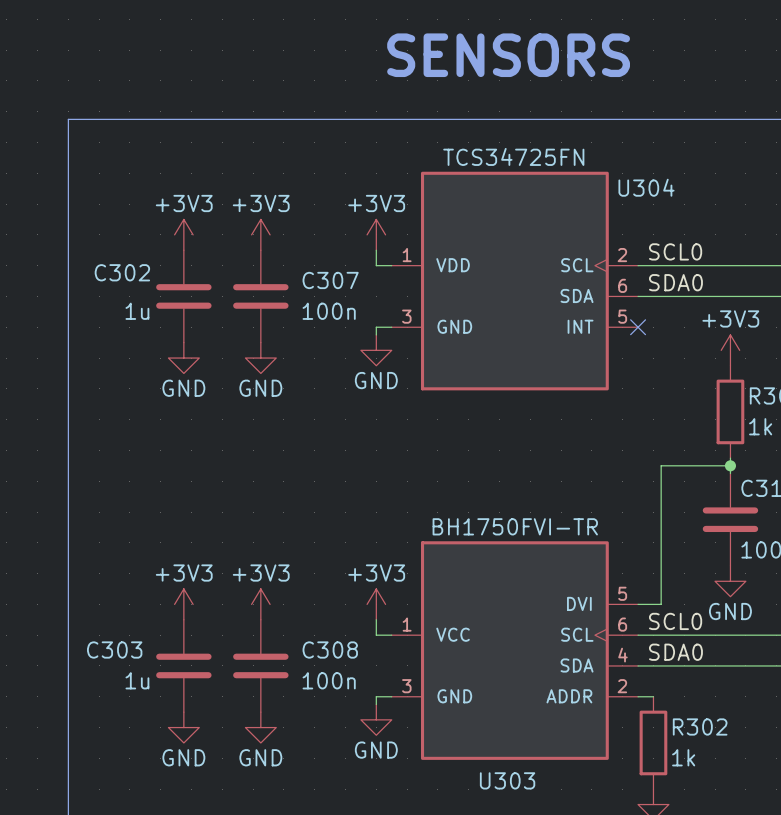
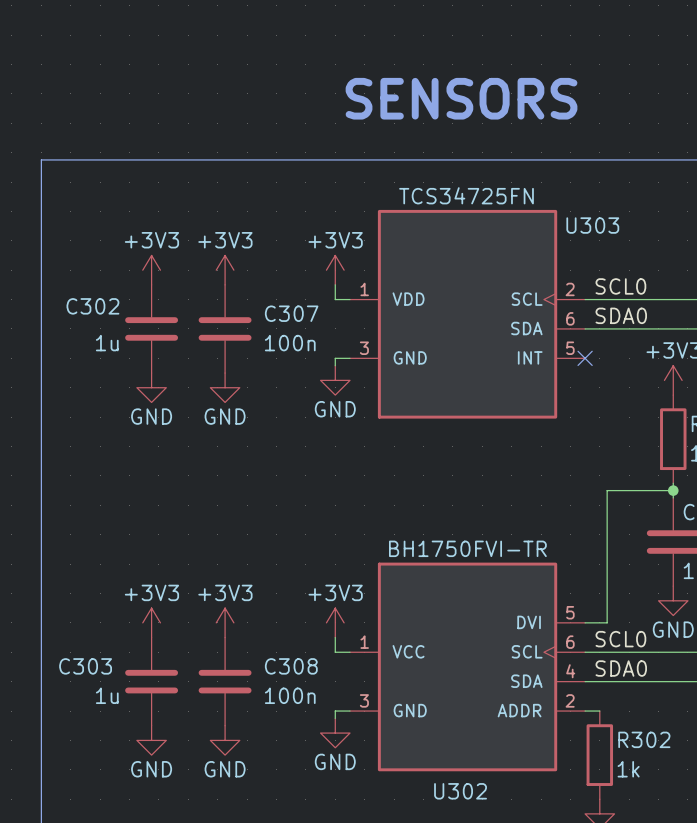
U304 name: U304 (646, 187) -> U303 (592, 225)
U303 name: U303 (507, 780) -> U302 (460, 791)

